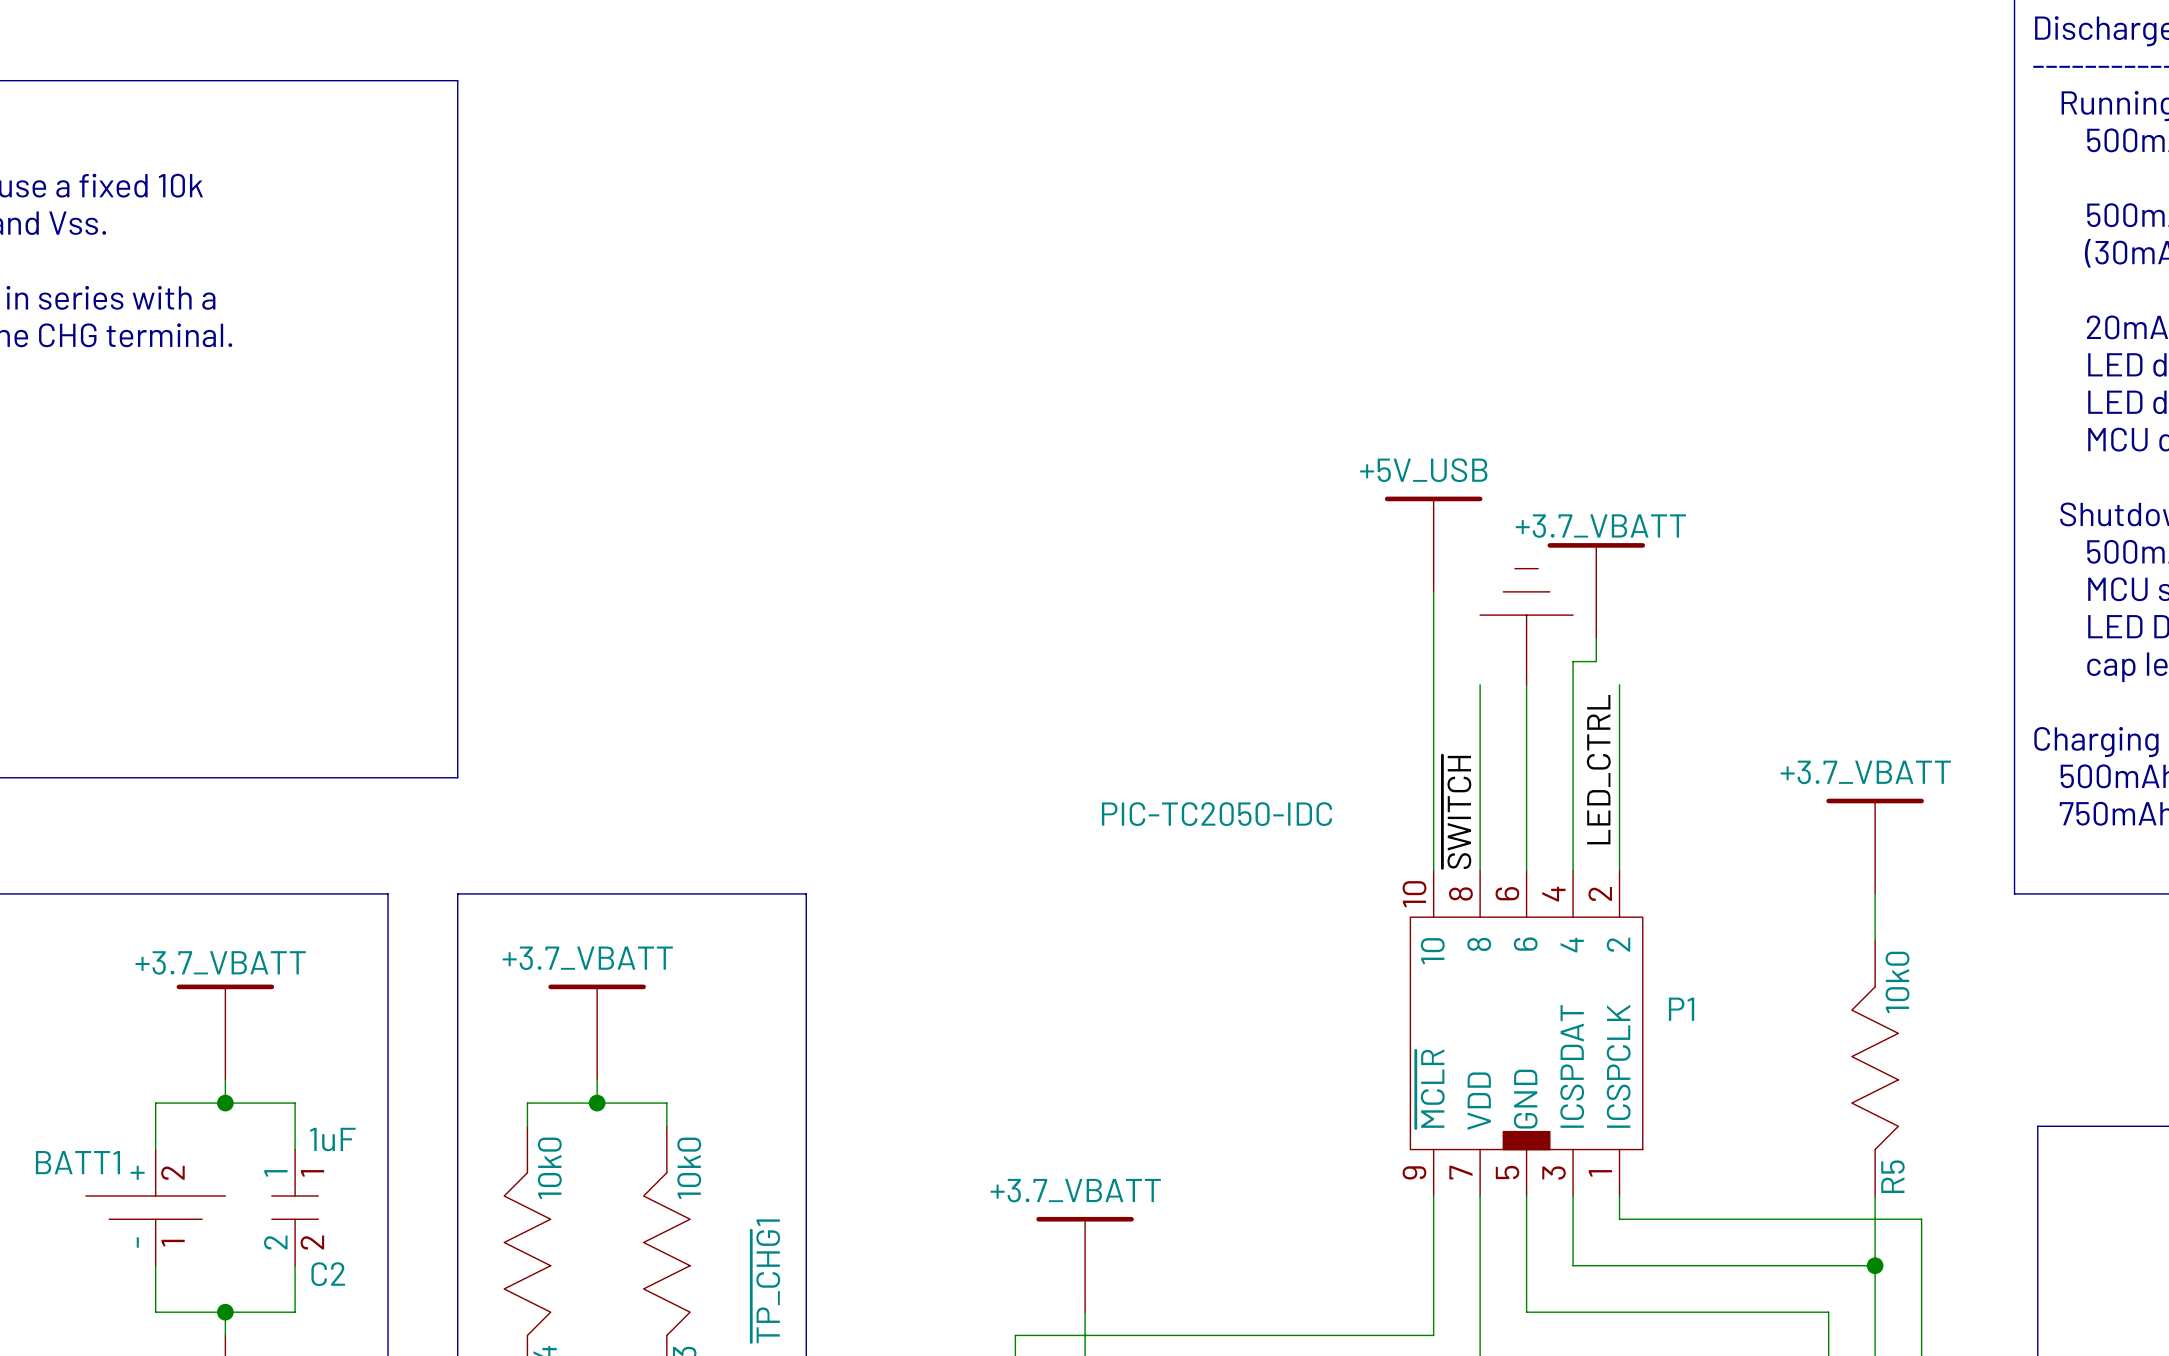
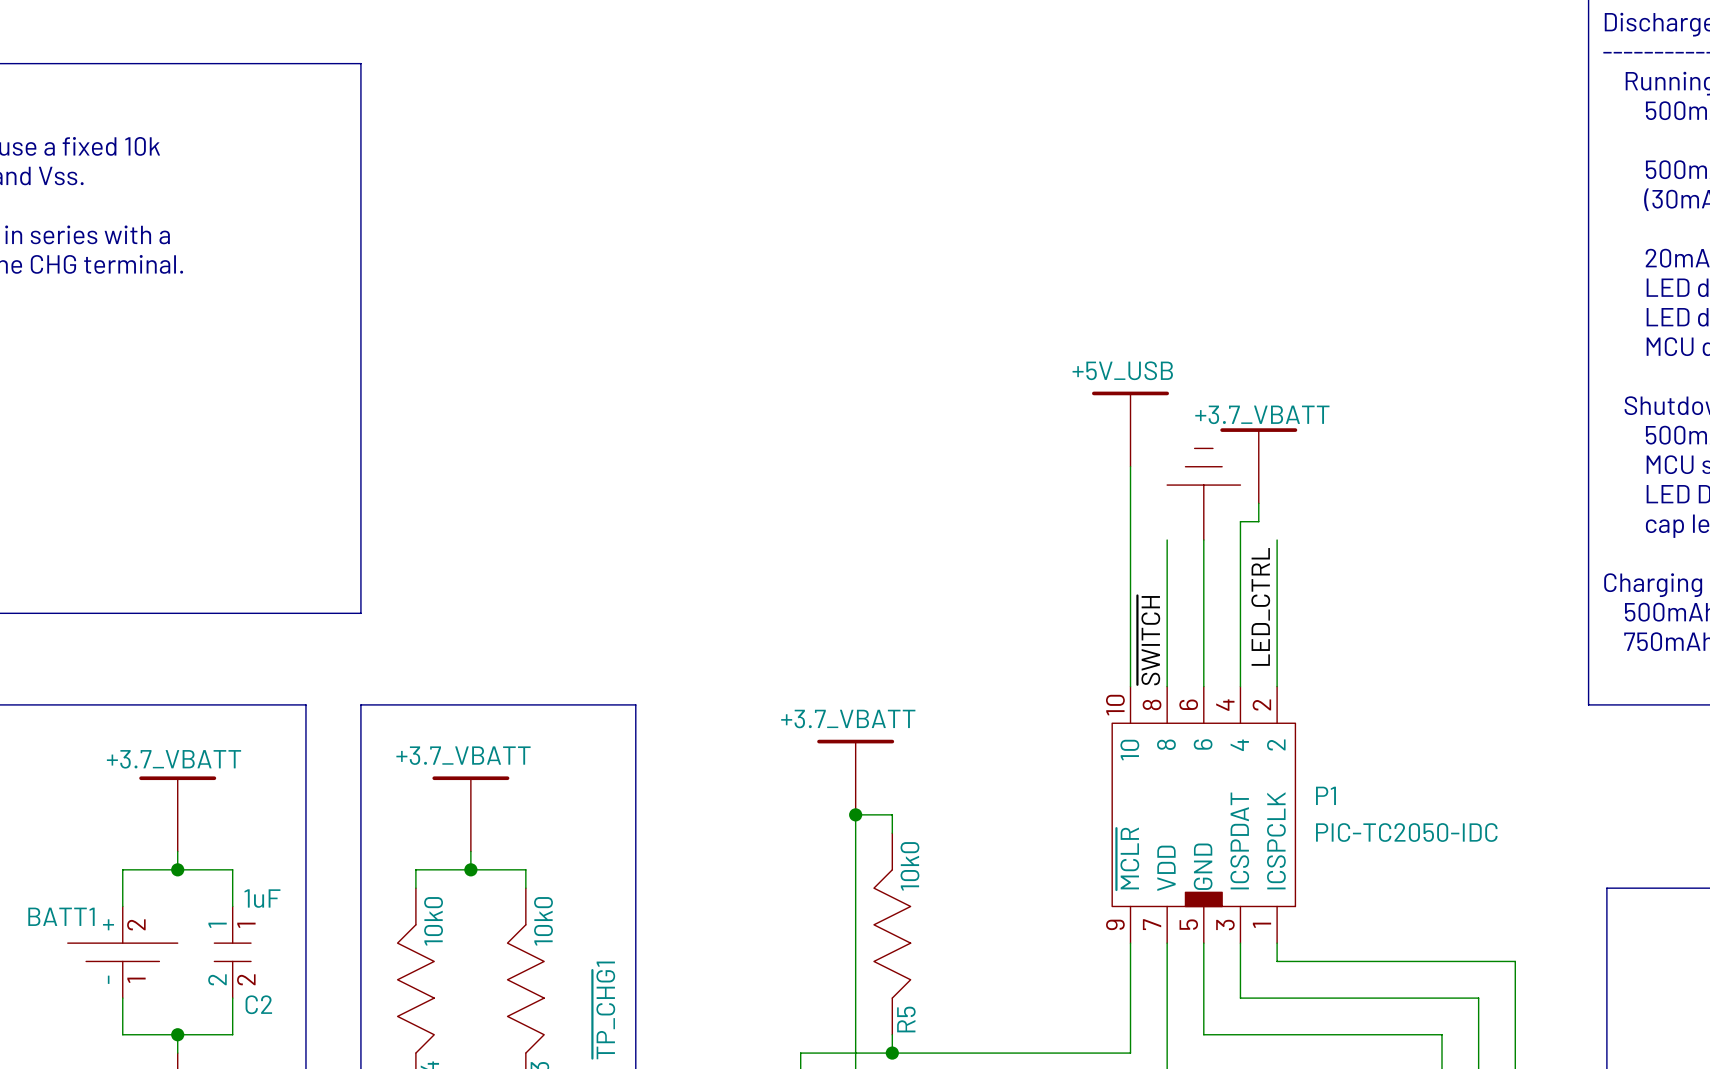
P1 value position: PIC-TC2050-IDC (1217, 814) -> PIC-TC2050-IDC (1406, 832)
power symbol: +3.7_VBATT (1875, 846) -> none
wire: (1875, 893) (1875, 940) -> none
junction: none -> (855, 814)
wire: none -> (892, 833) (892, 814) (855, 814) (855, 1034)
R5 position: (1875, 1068) -> (892, 933)
wire: (1875, 1196) (1875, 1265) -> none
power symbol position: +3.7_VBATT (1085, 1264) -> +3.7_VBATT (855, 777)
junction: (1875, 1265) -> none
wire: none -> (892, 1034) (892, 1053)
junction: none -> (892, 1053)

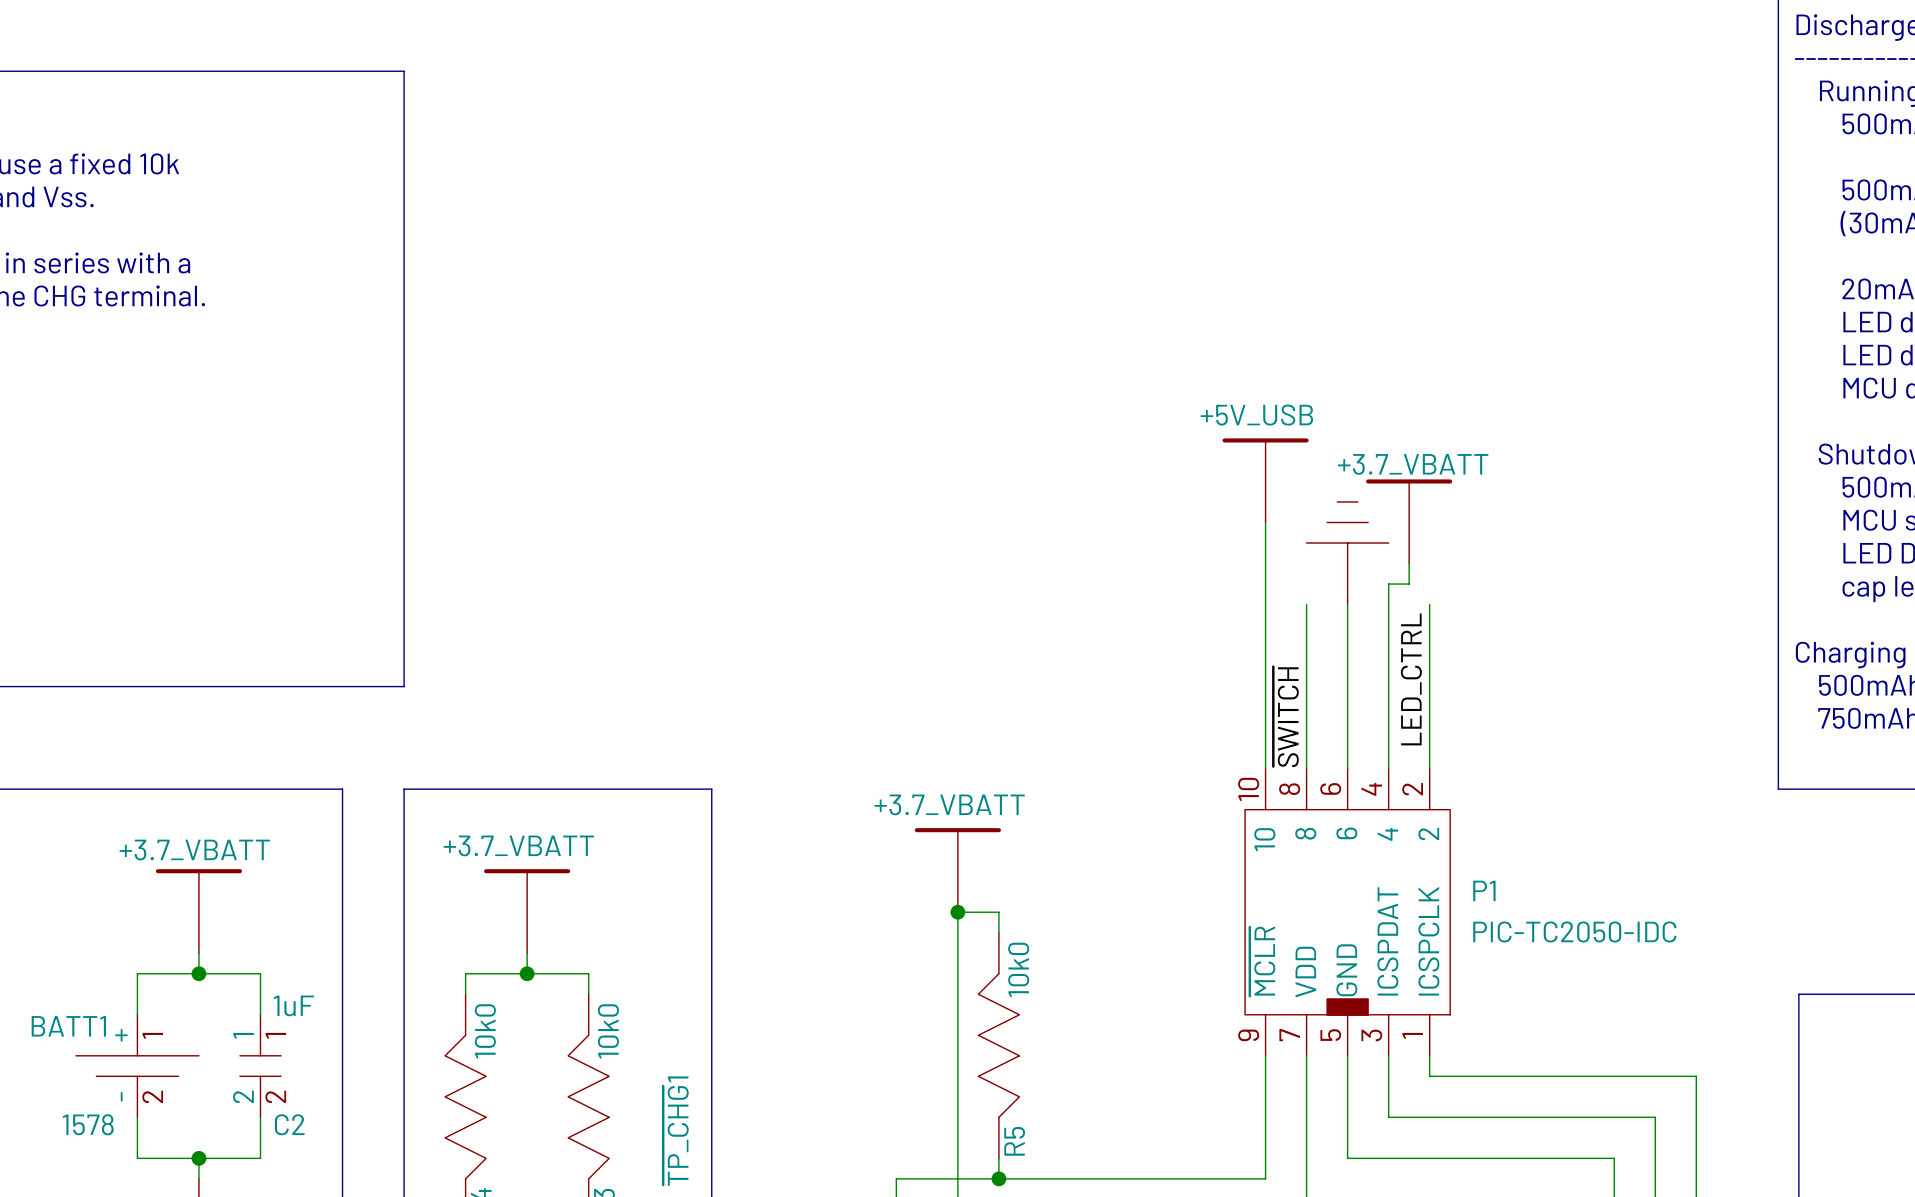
BATT1 pin number: 2 (136, 924) -> 1 (152, 1035)
BATT1 pin number: 1 (136, 980) -> 2 (152, 1096)
BATT1 value: none -> 1578 (88, 1124)

